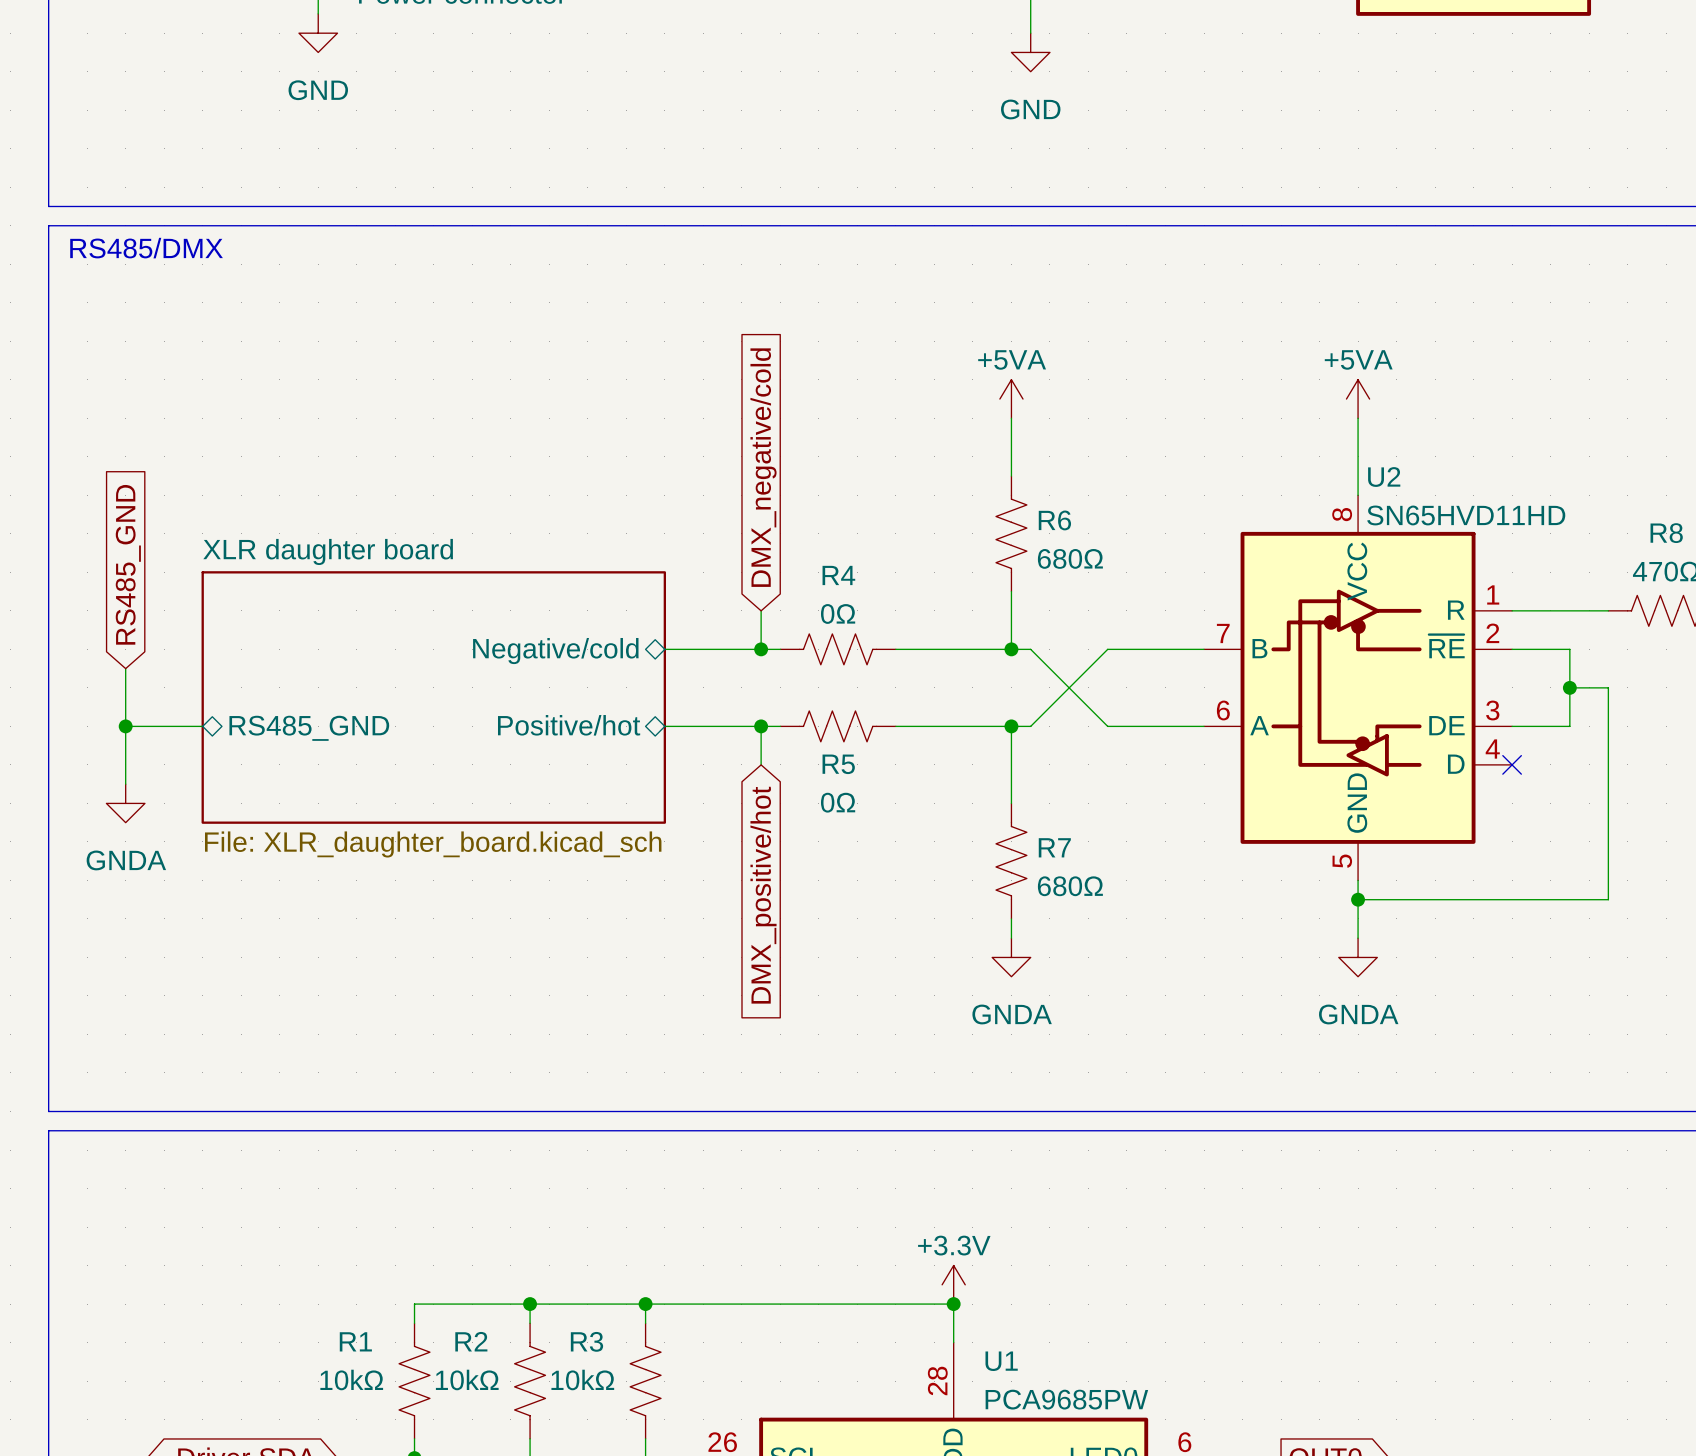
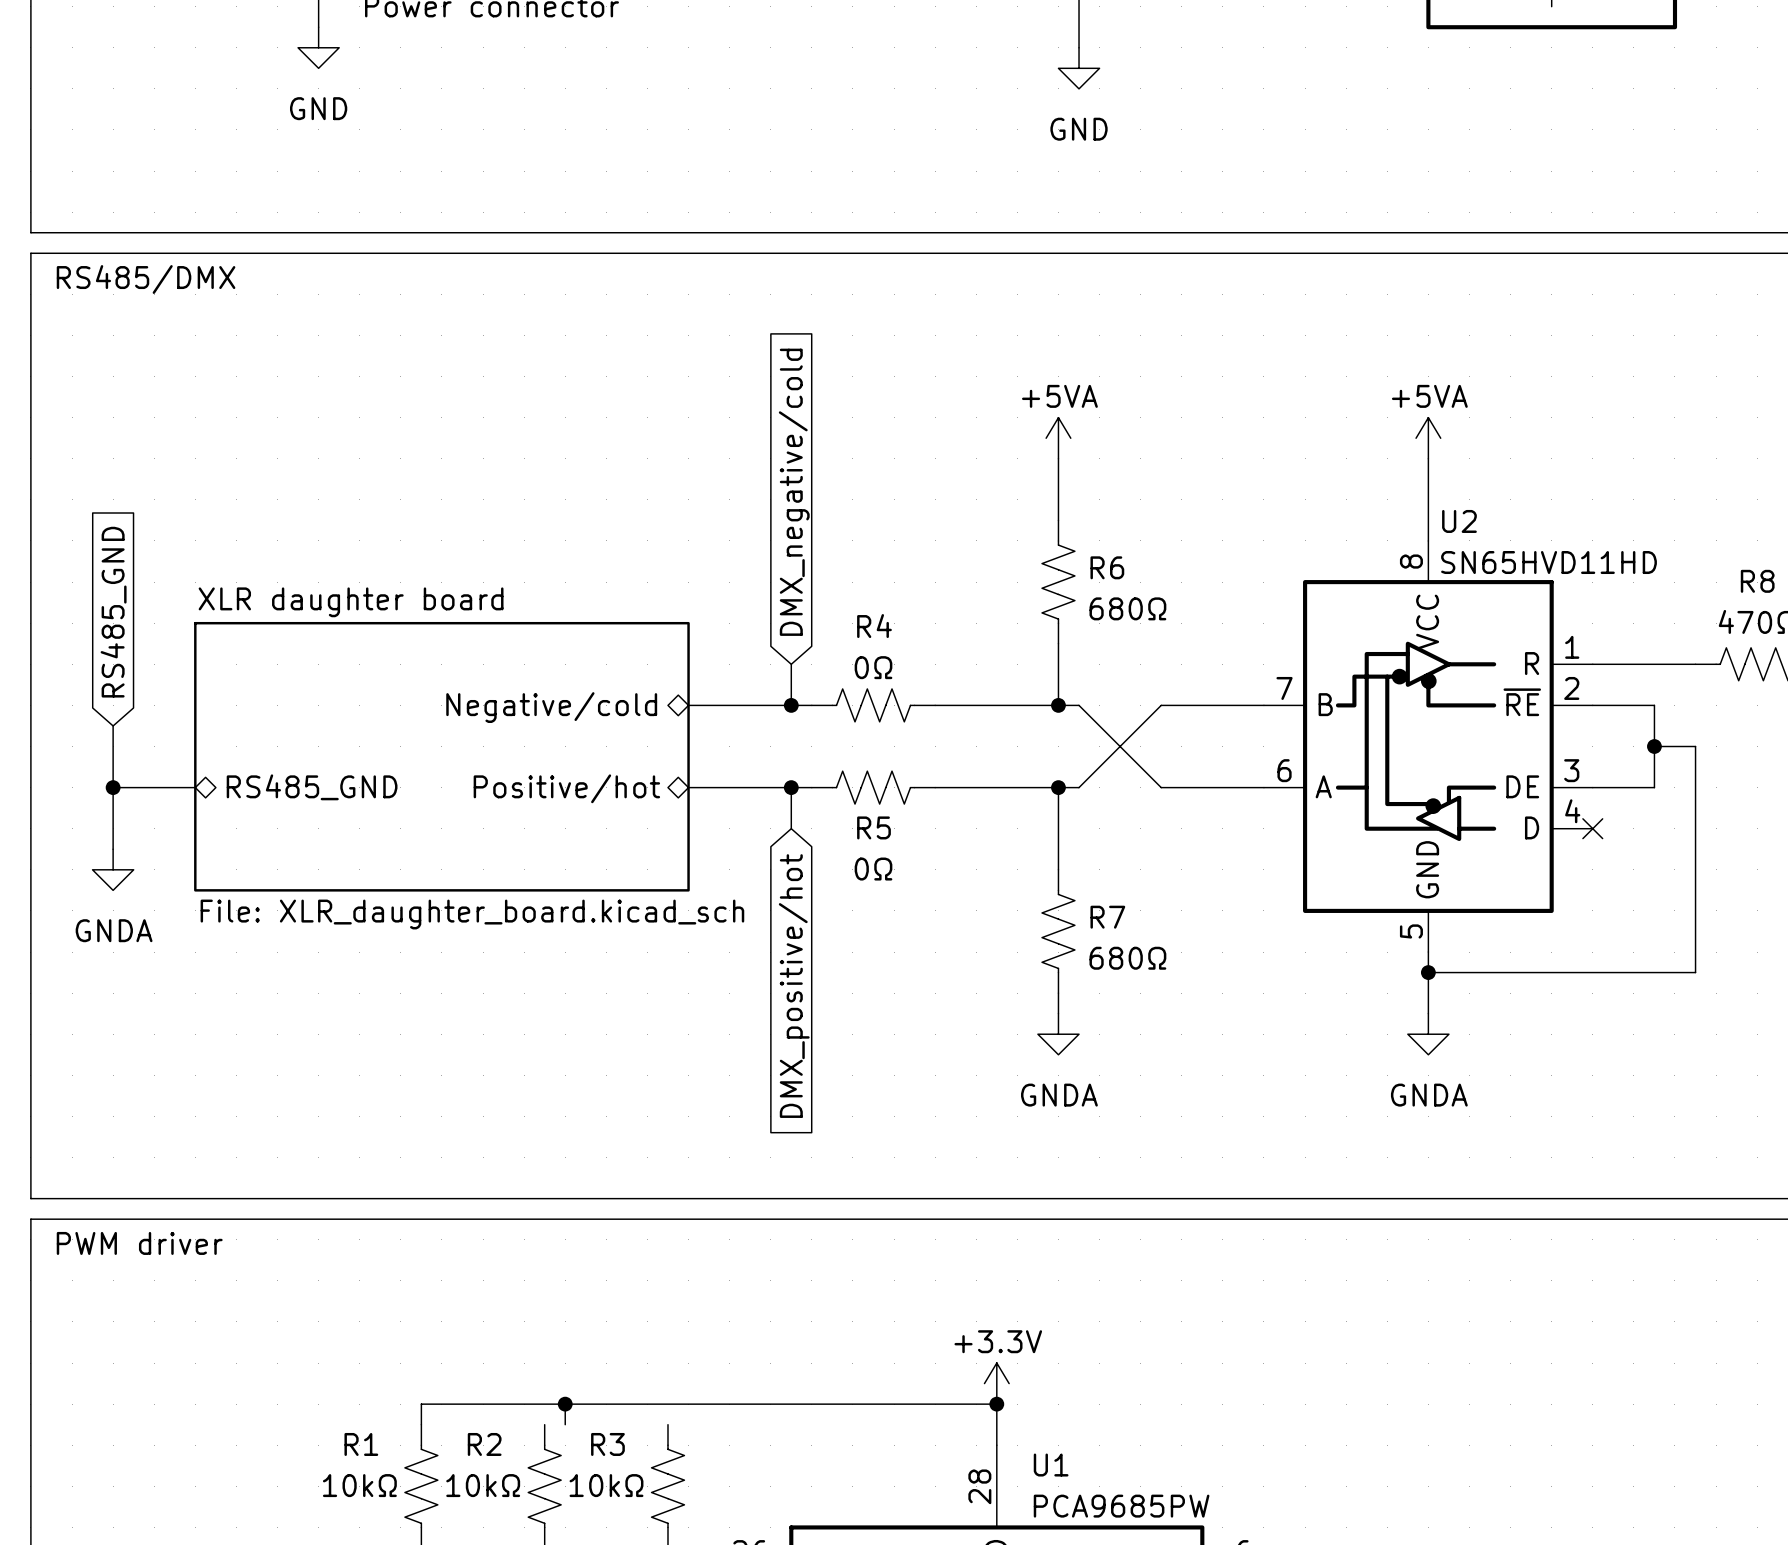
text: none -> PWM driver (139, 1243)
wire: (530, 1304) (530, 1323) -> (565, 1404) (565, 1424)
junction position: (530, 1304) -> (565, 1404)
wire: (645, 1304) (645, 1323) -> none
junction: (645, 1304) -> none

